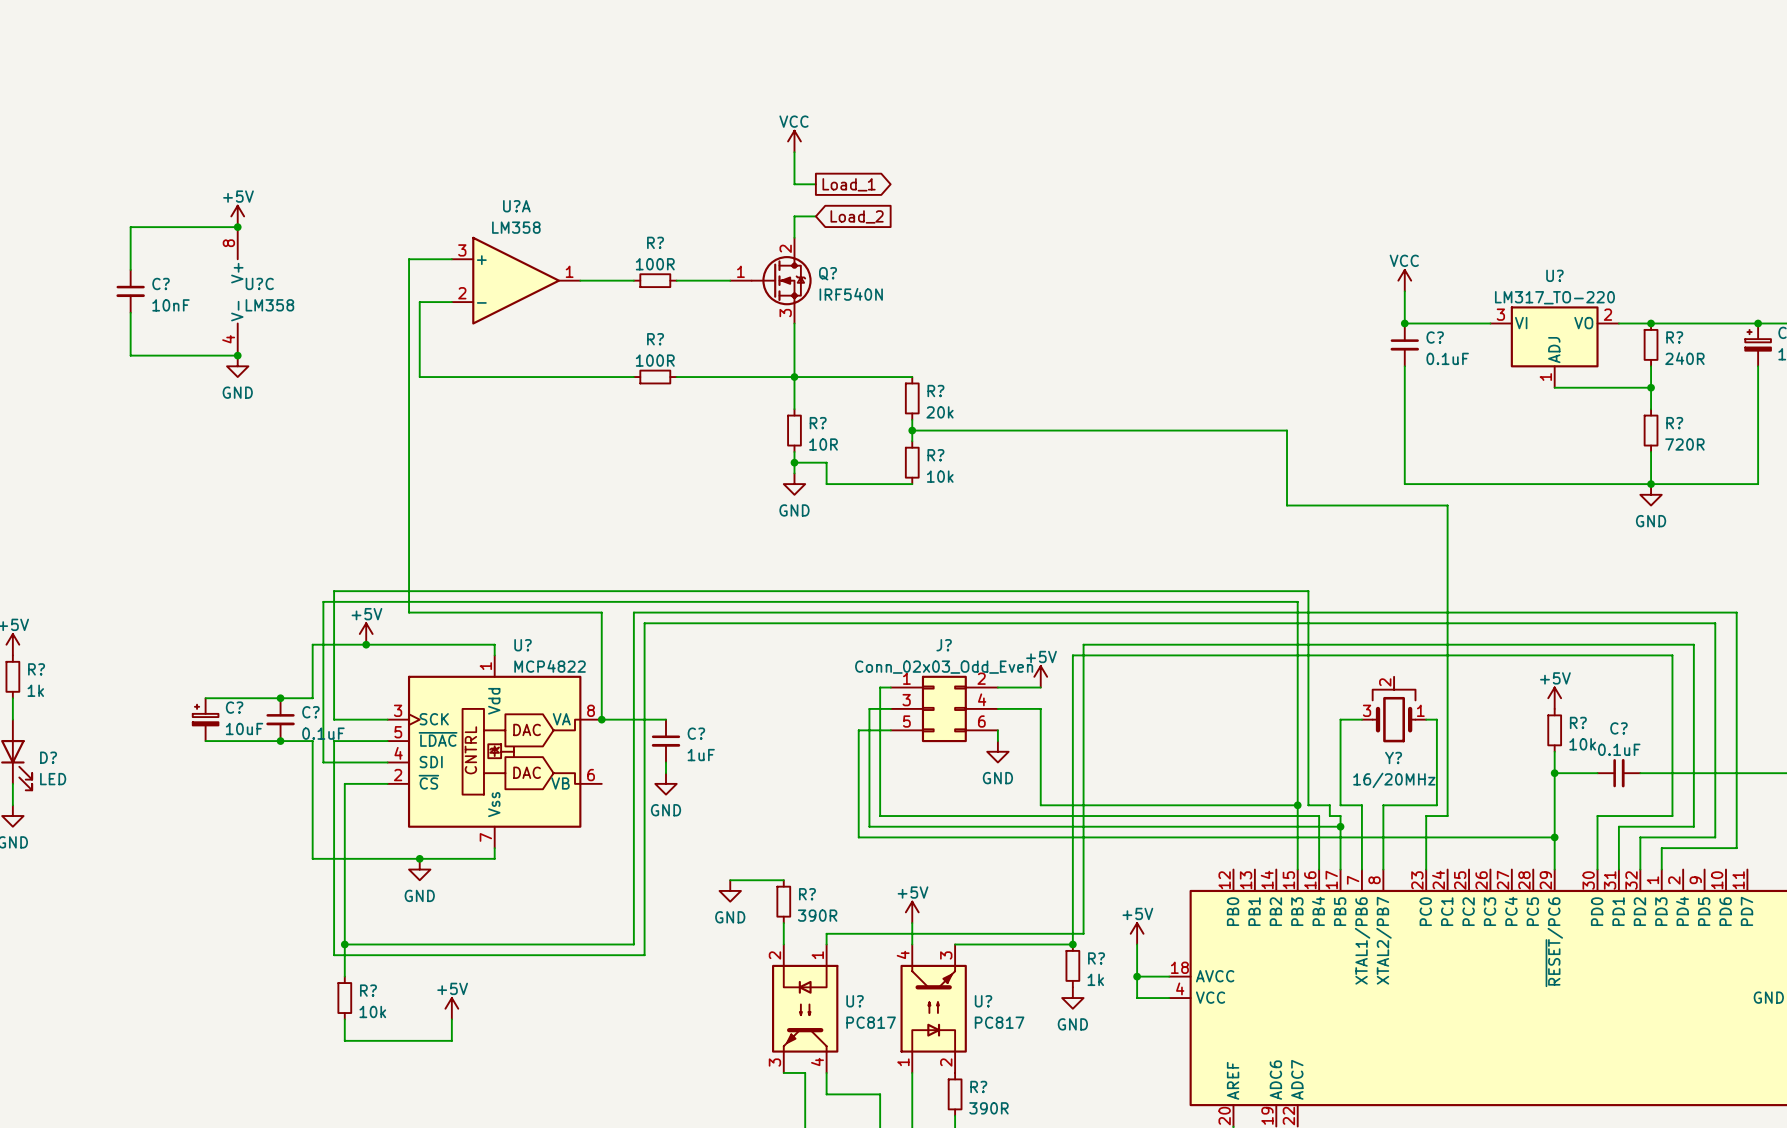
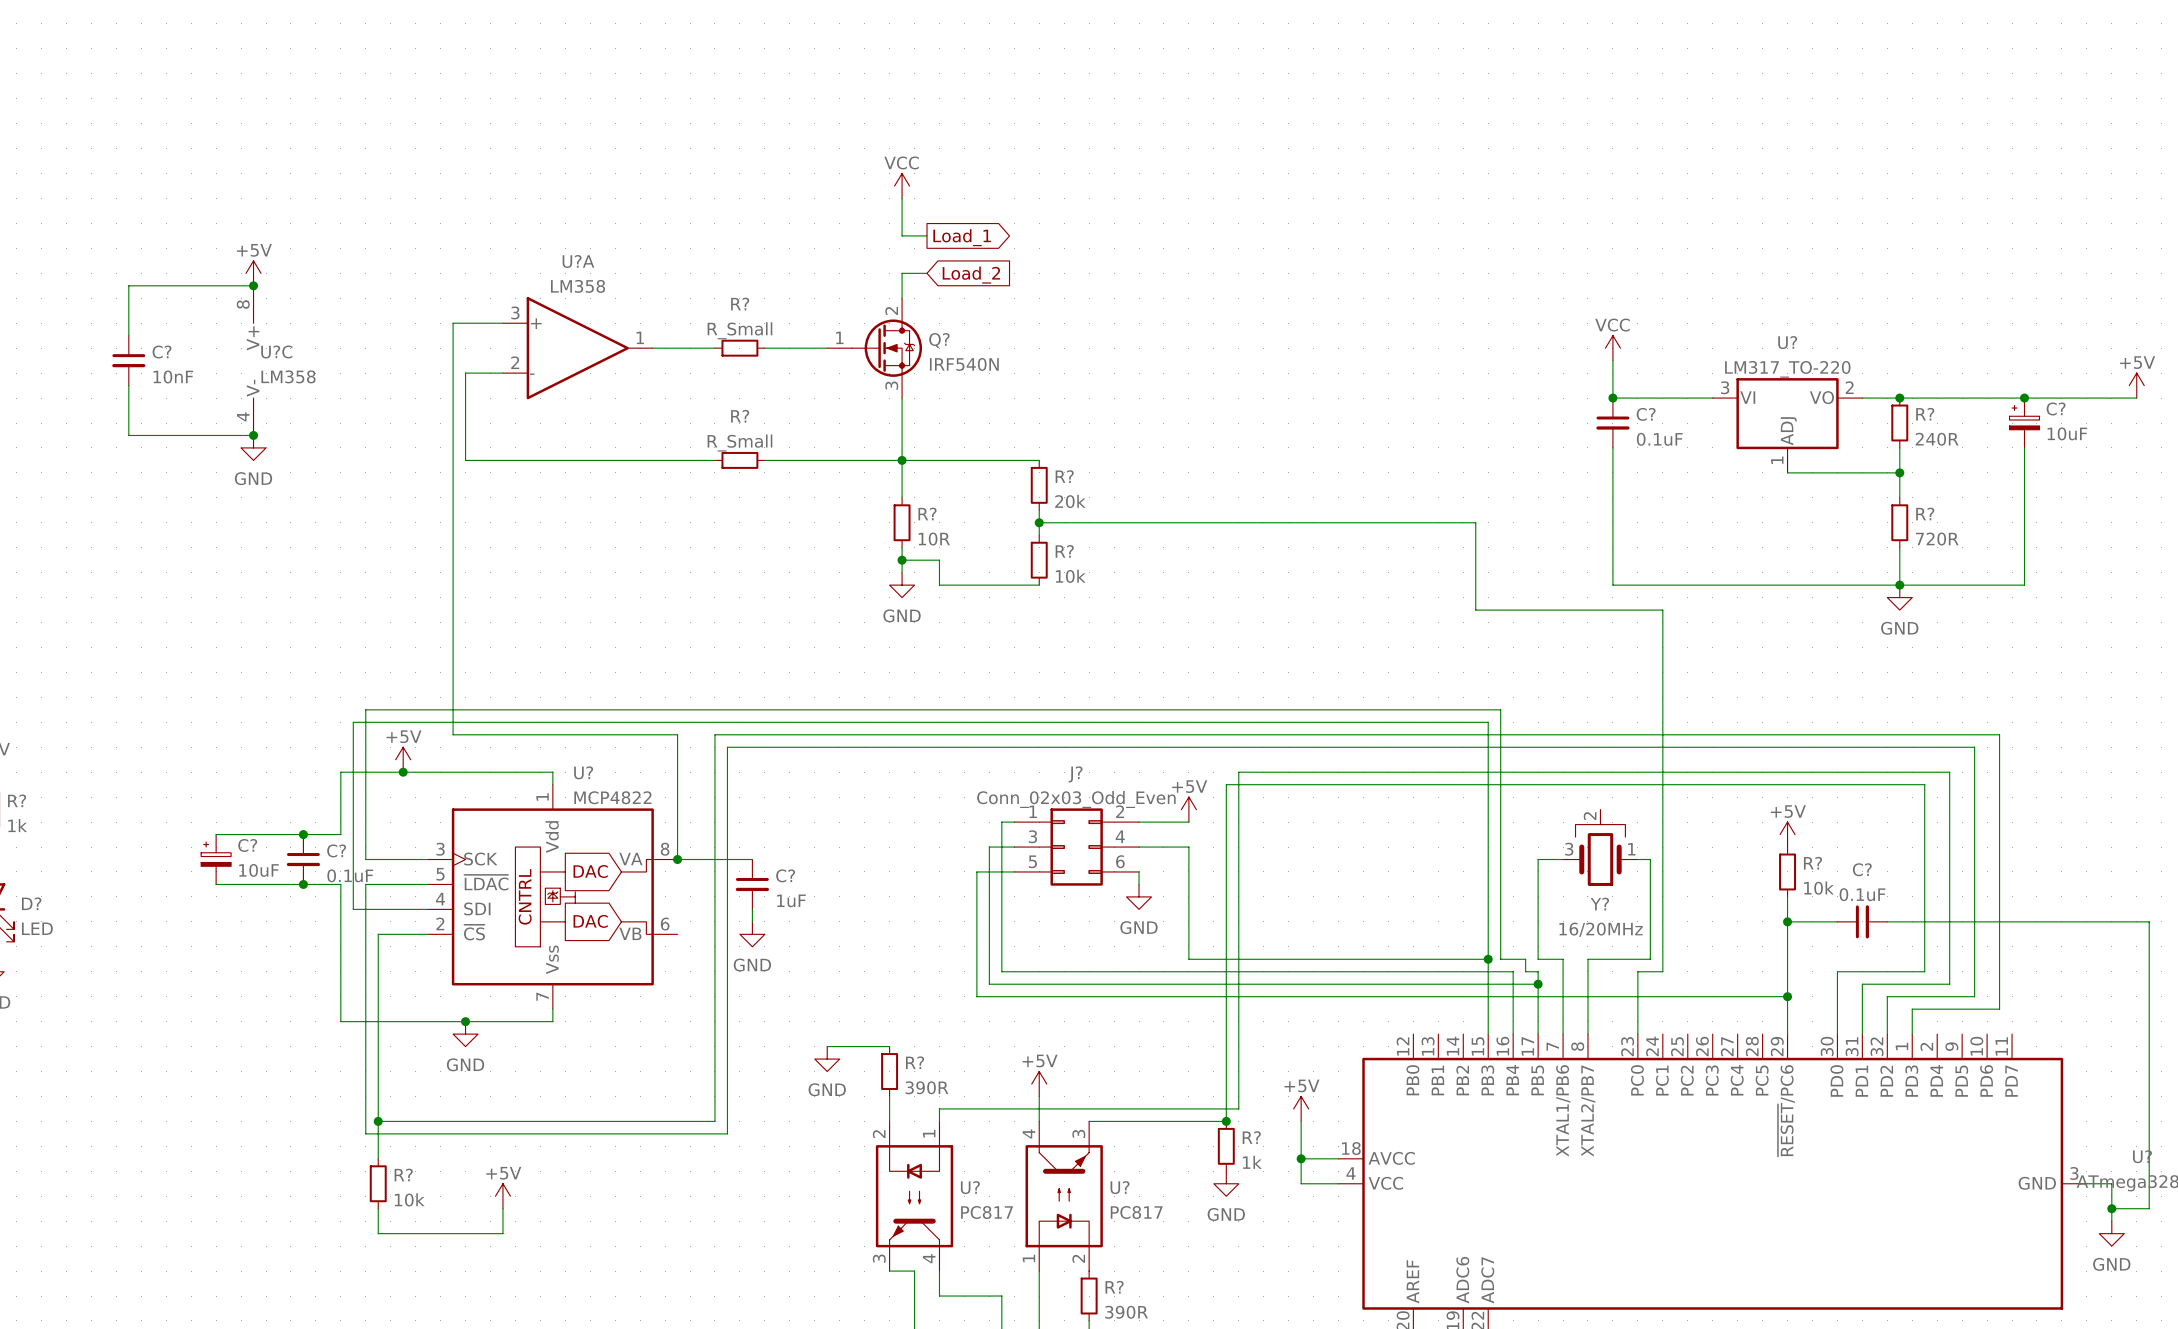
R? value: 100R (655, 264) -> R_Small (739, 330)
R? value: 100R (655, 360) -> R_Small (739, 443)

